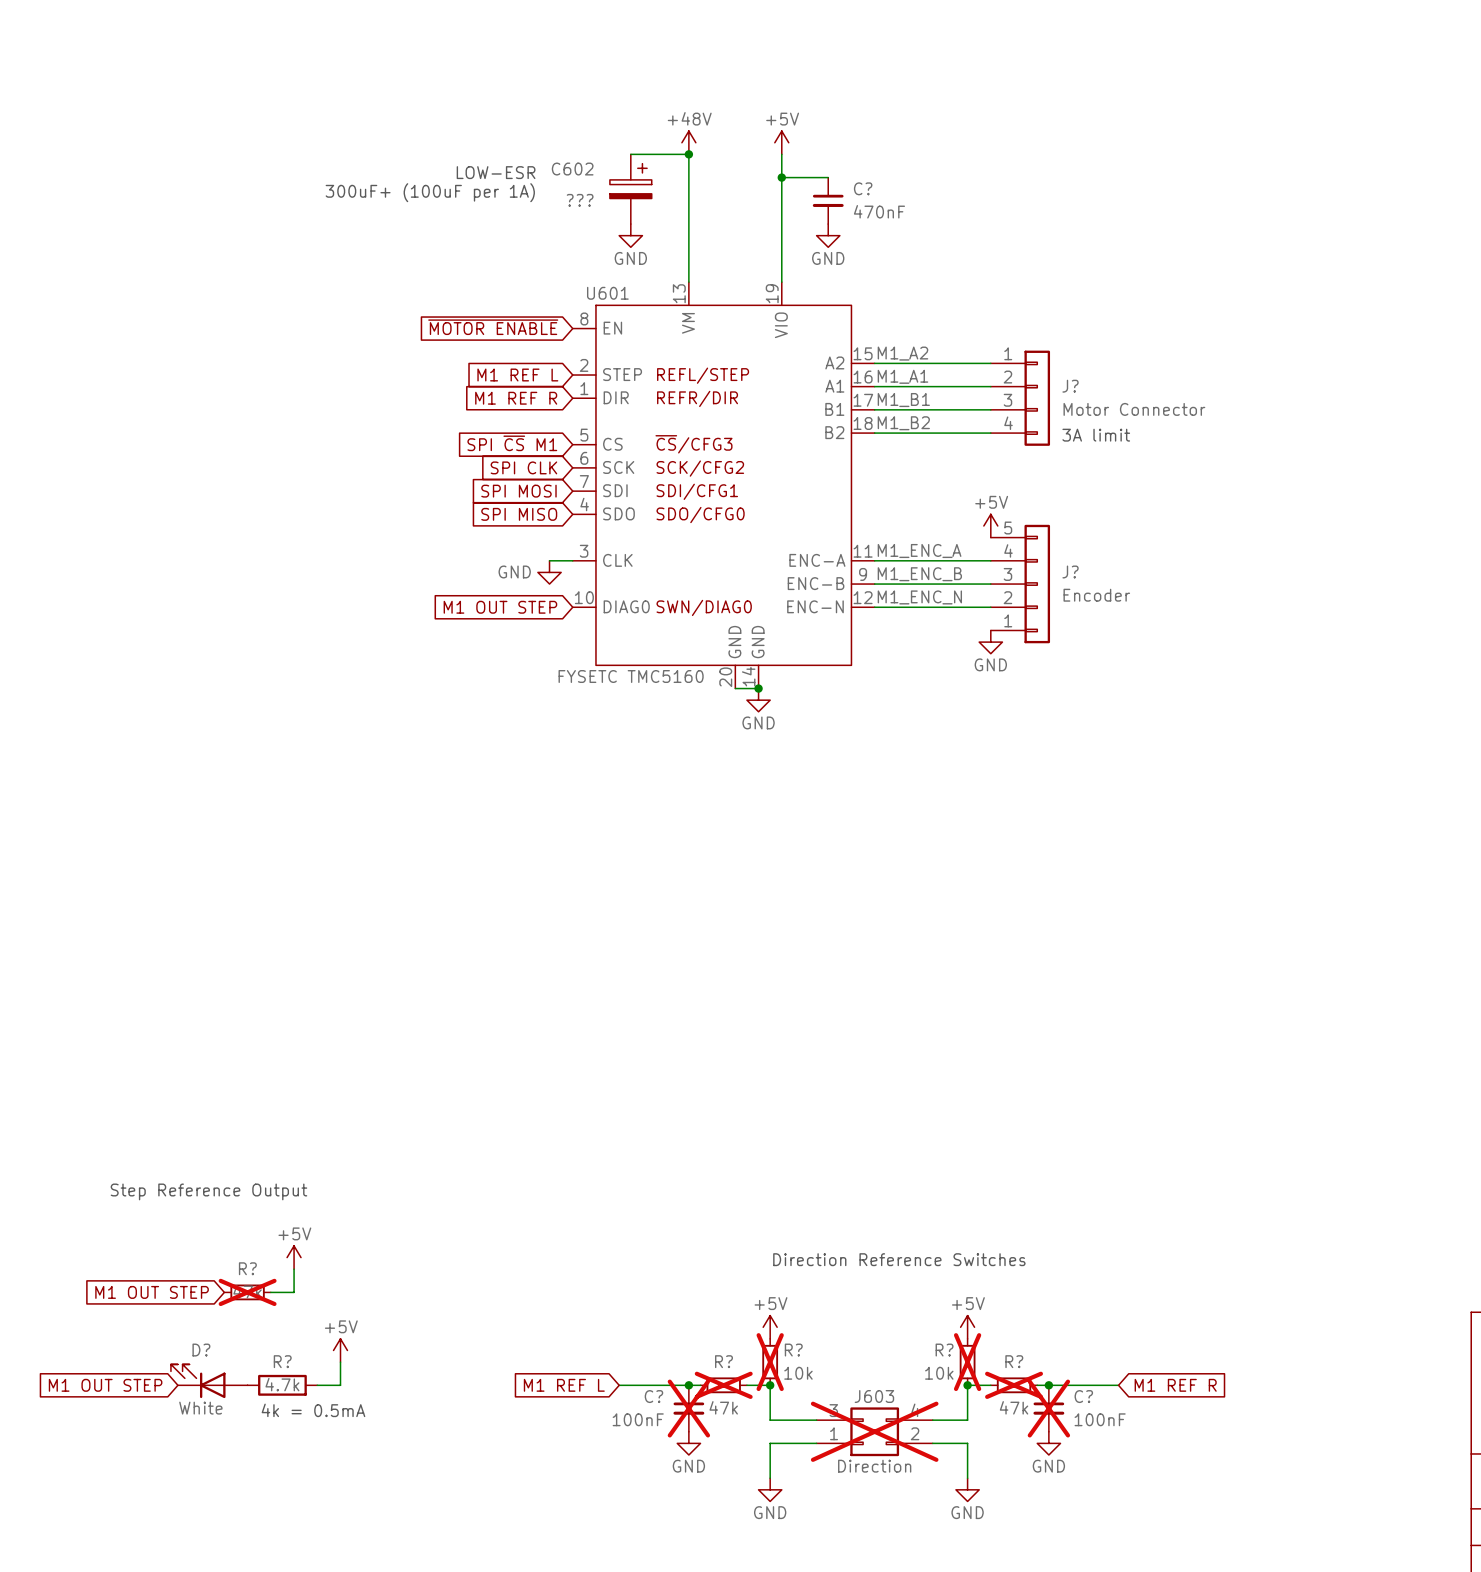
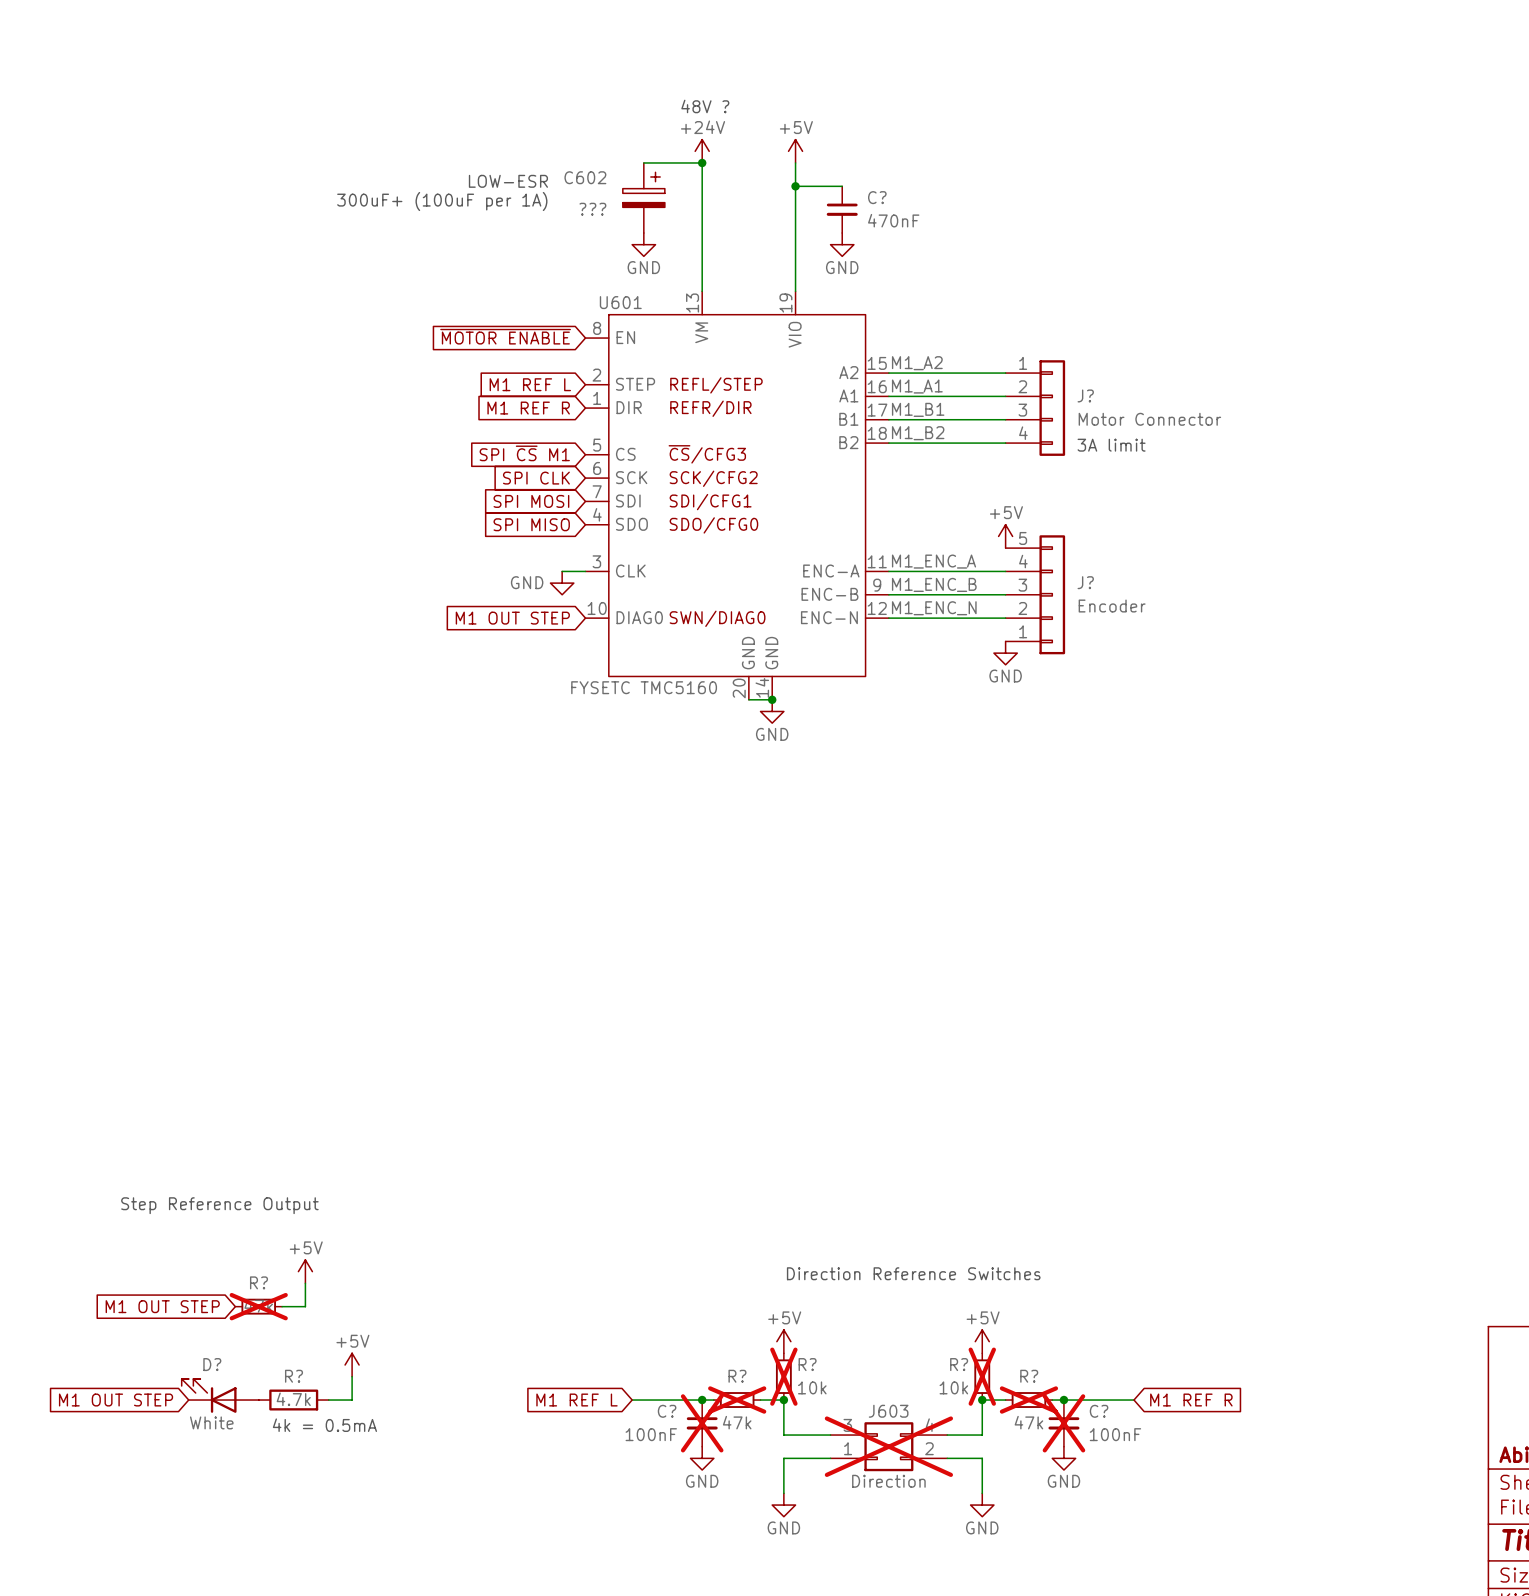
text: none -> 48V ? (705, 106)
power symbol: +48V (688, 142) -> +24V (702, 151)

